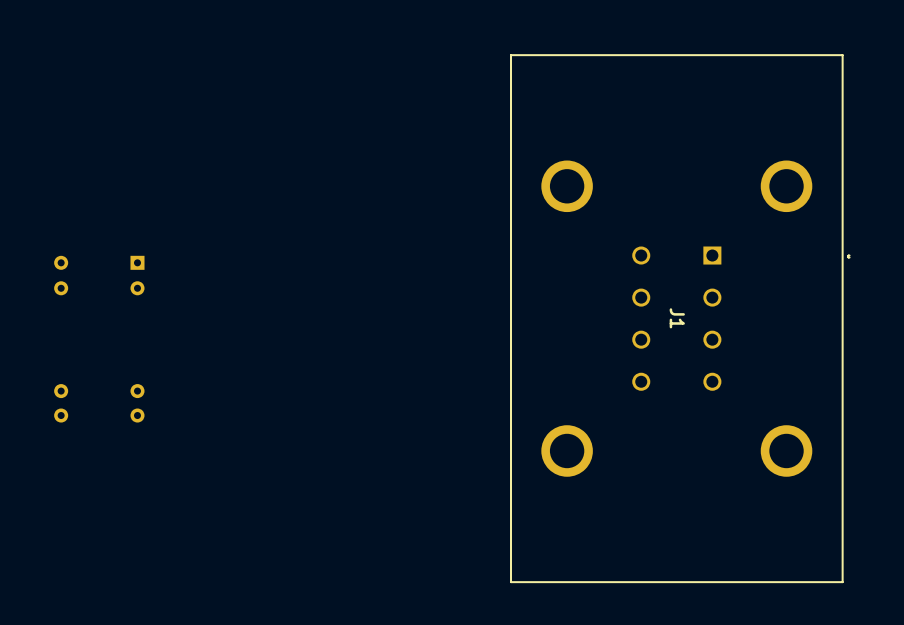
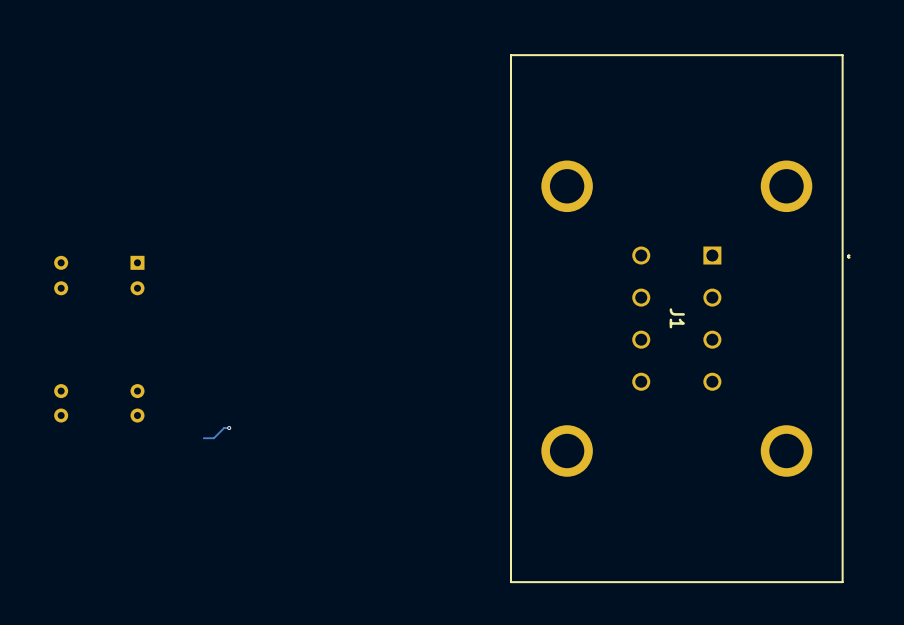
track: none -> (229, 428) (224, 428) (213, 438) (203, 438)
via: none -> (229, 428)

